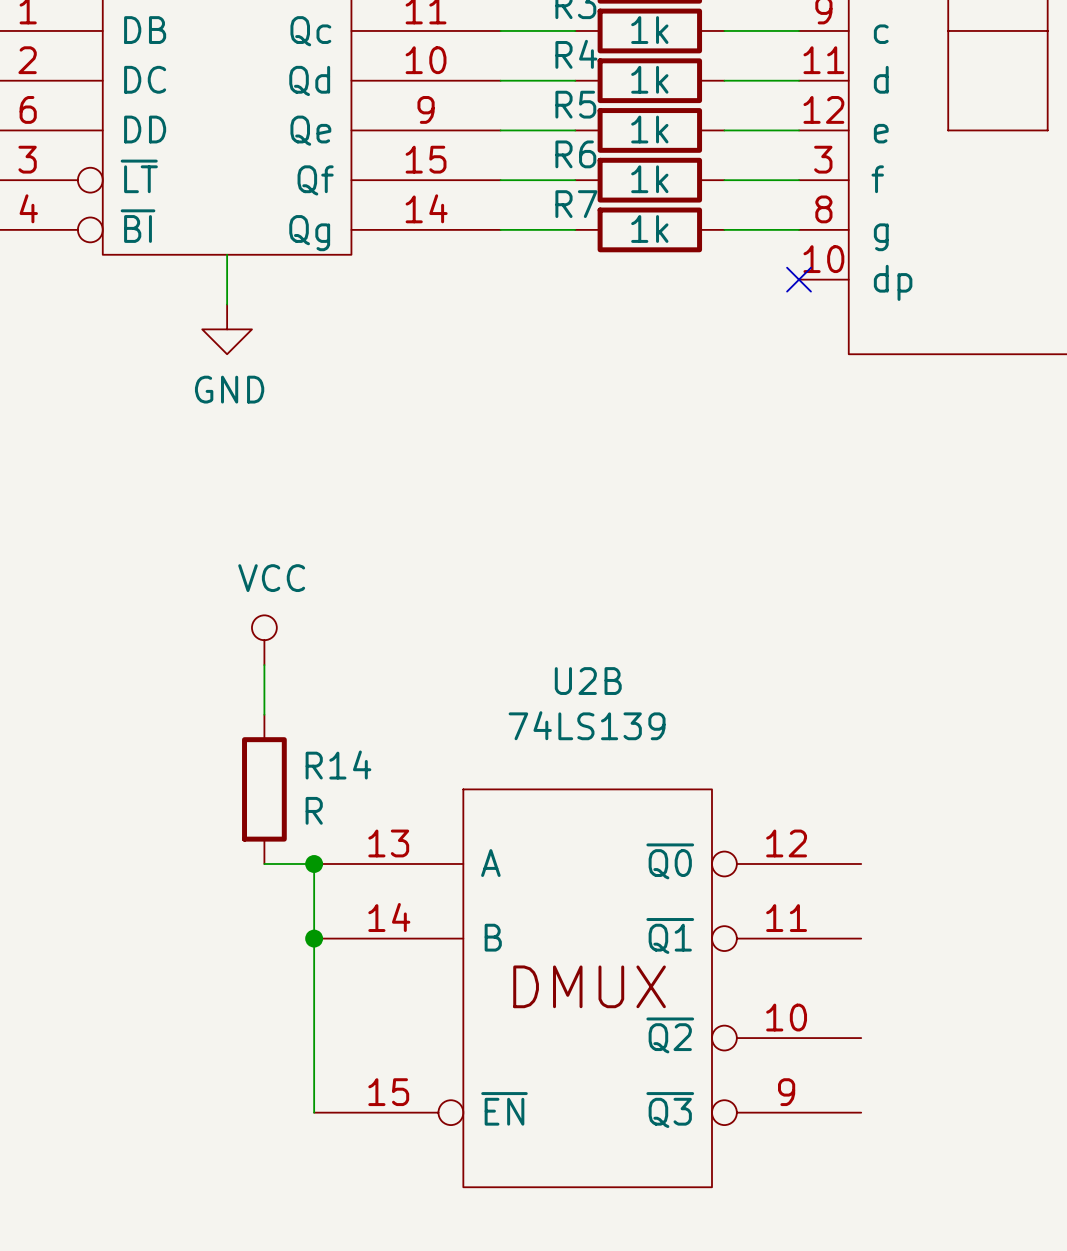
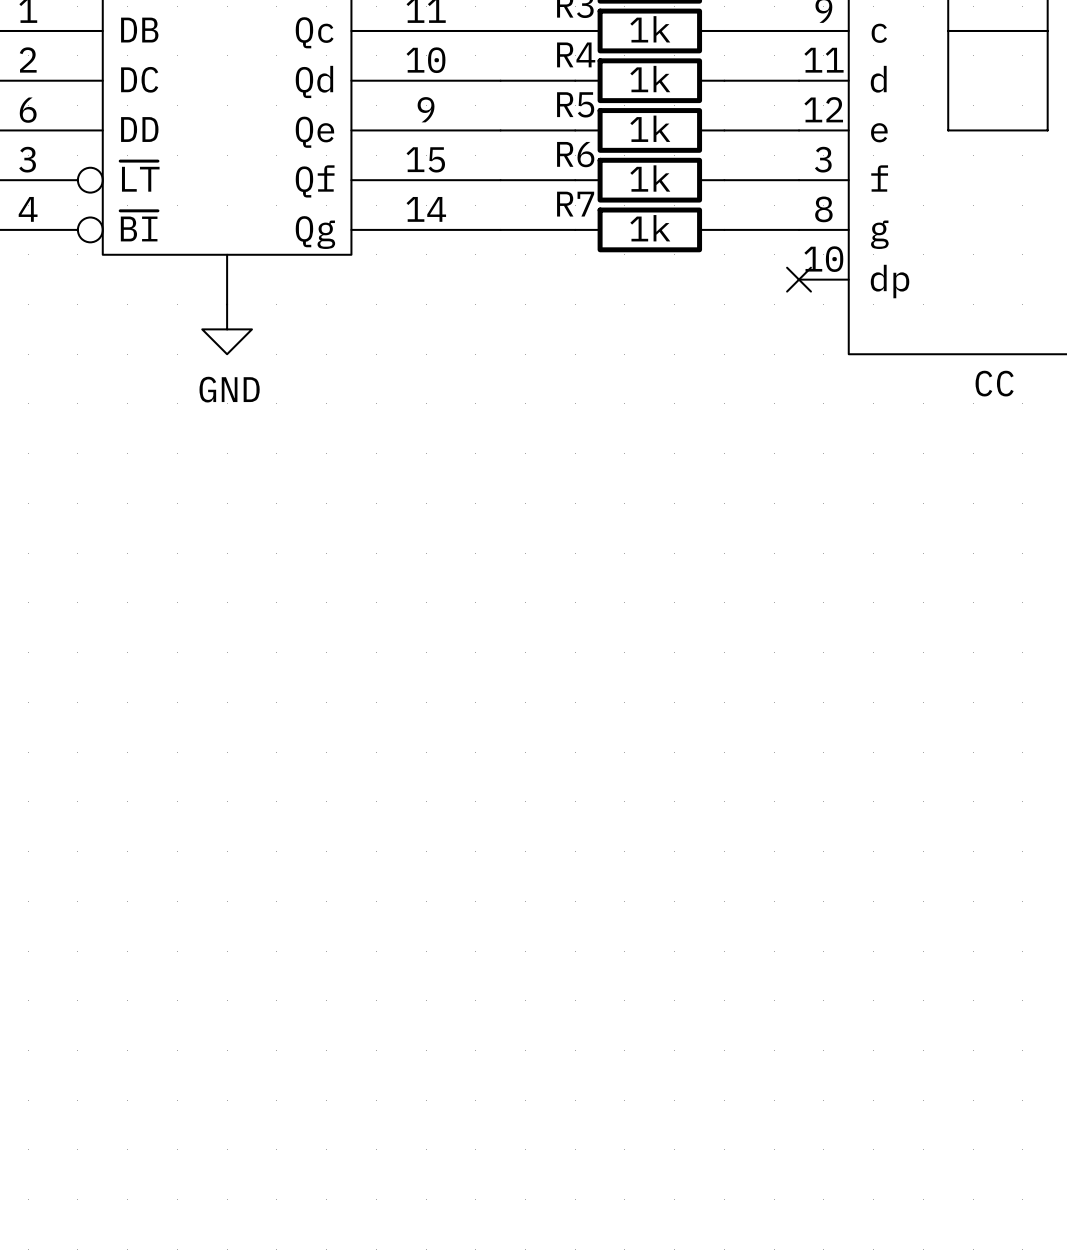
text: none -> CC (994, 383)
power symbol: VCC (264, 640) -> none
wire: (264, 665) (264, 714) -> none
R14: R (264, 789) -> none
wire: (264, 863) (314, 863) (314, 1112) -> none
junction: (314, 863) -> none
junction: (314, 938) -> none
U2B: 74LS139 (587, 988) -> none

